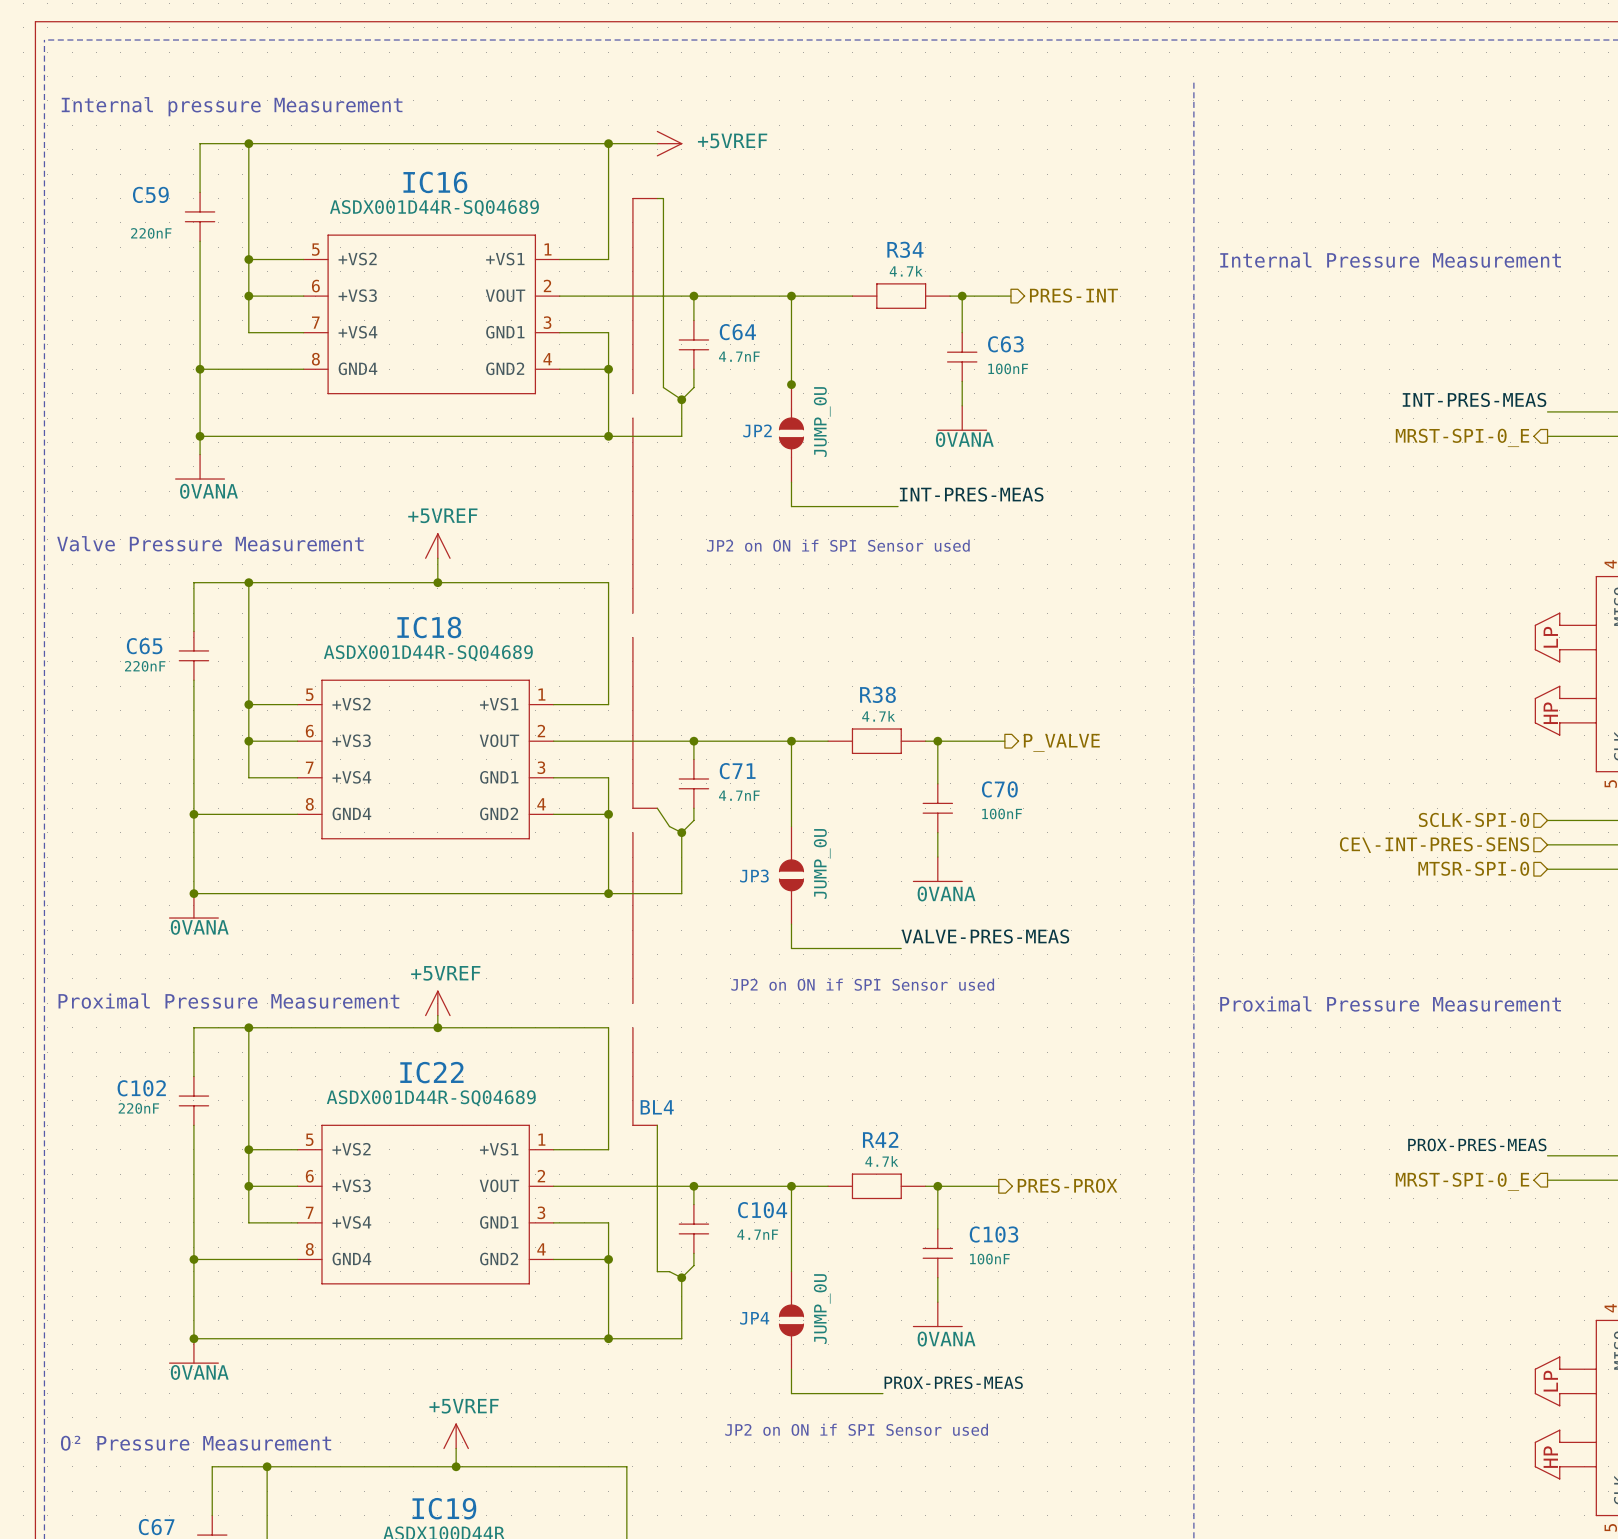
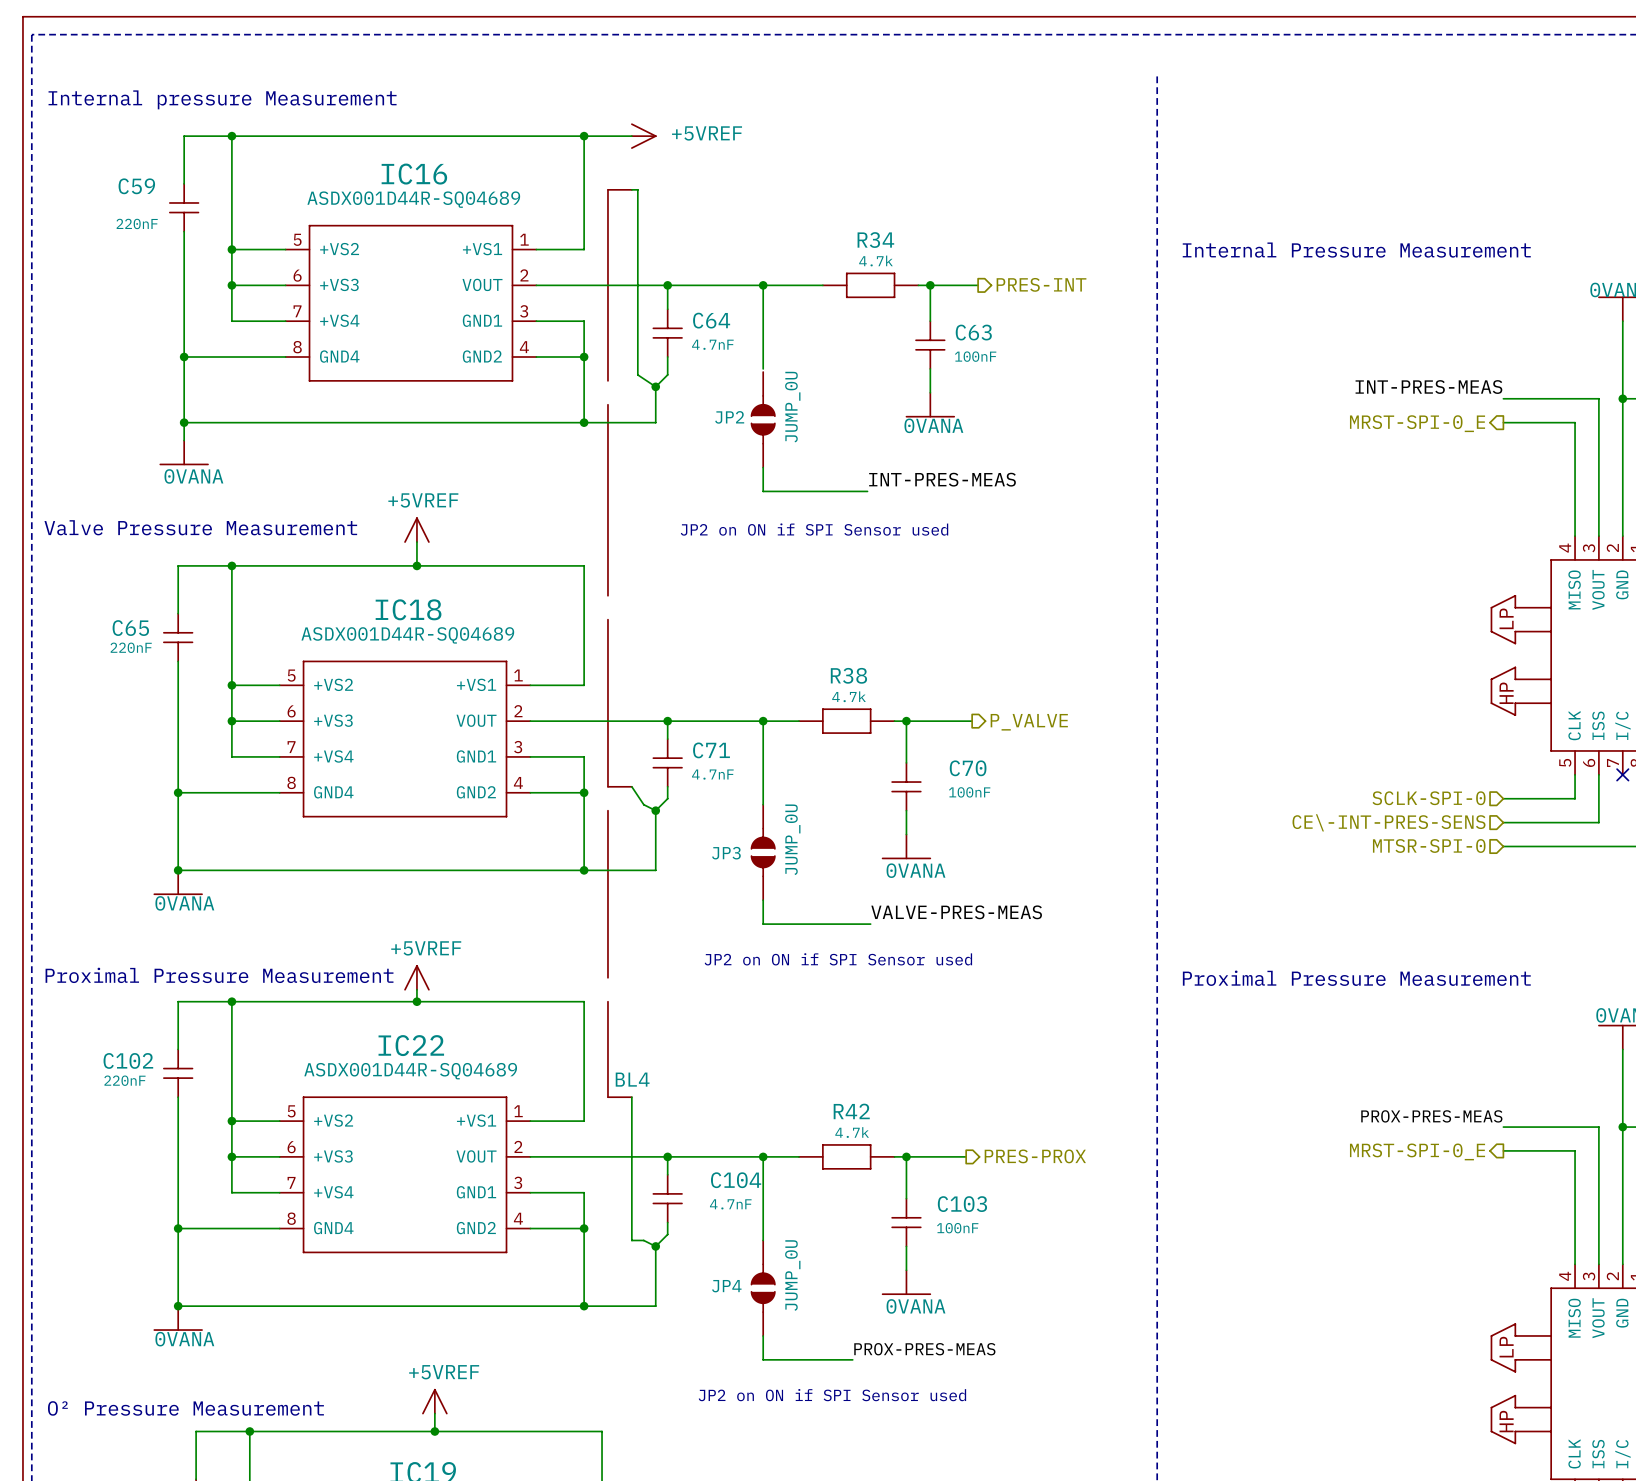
junction: (791, 384) -> none

